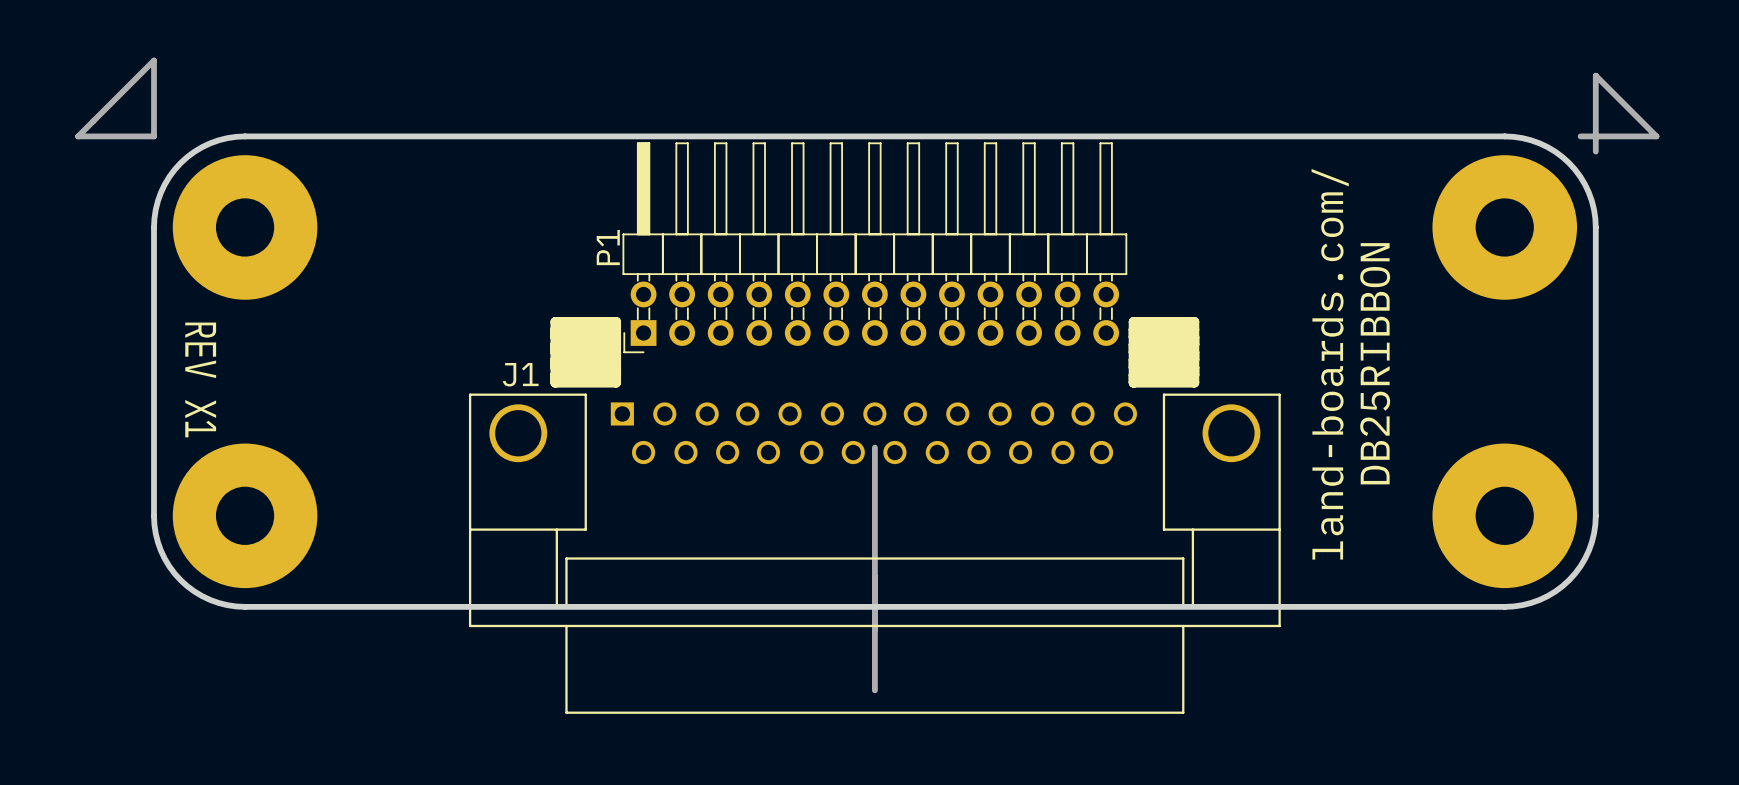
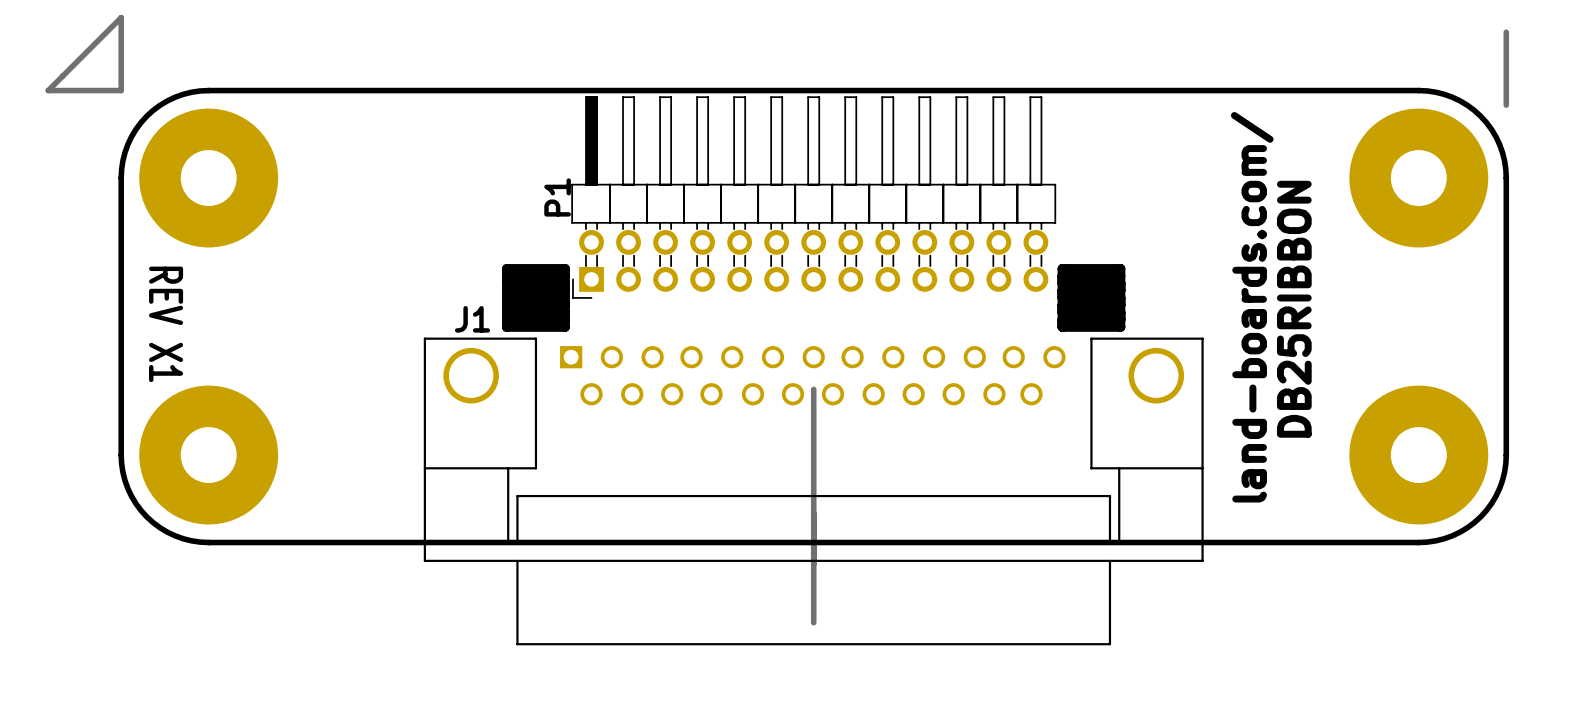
line: (1595, 75) (1656, 136) (1580, 136) -> none

